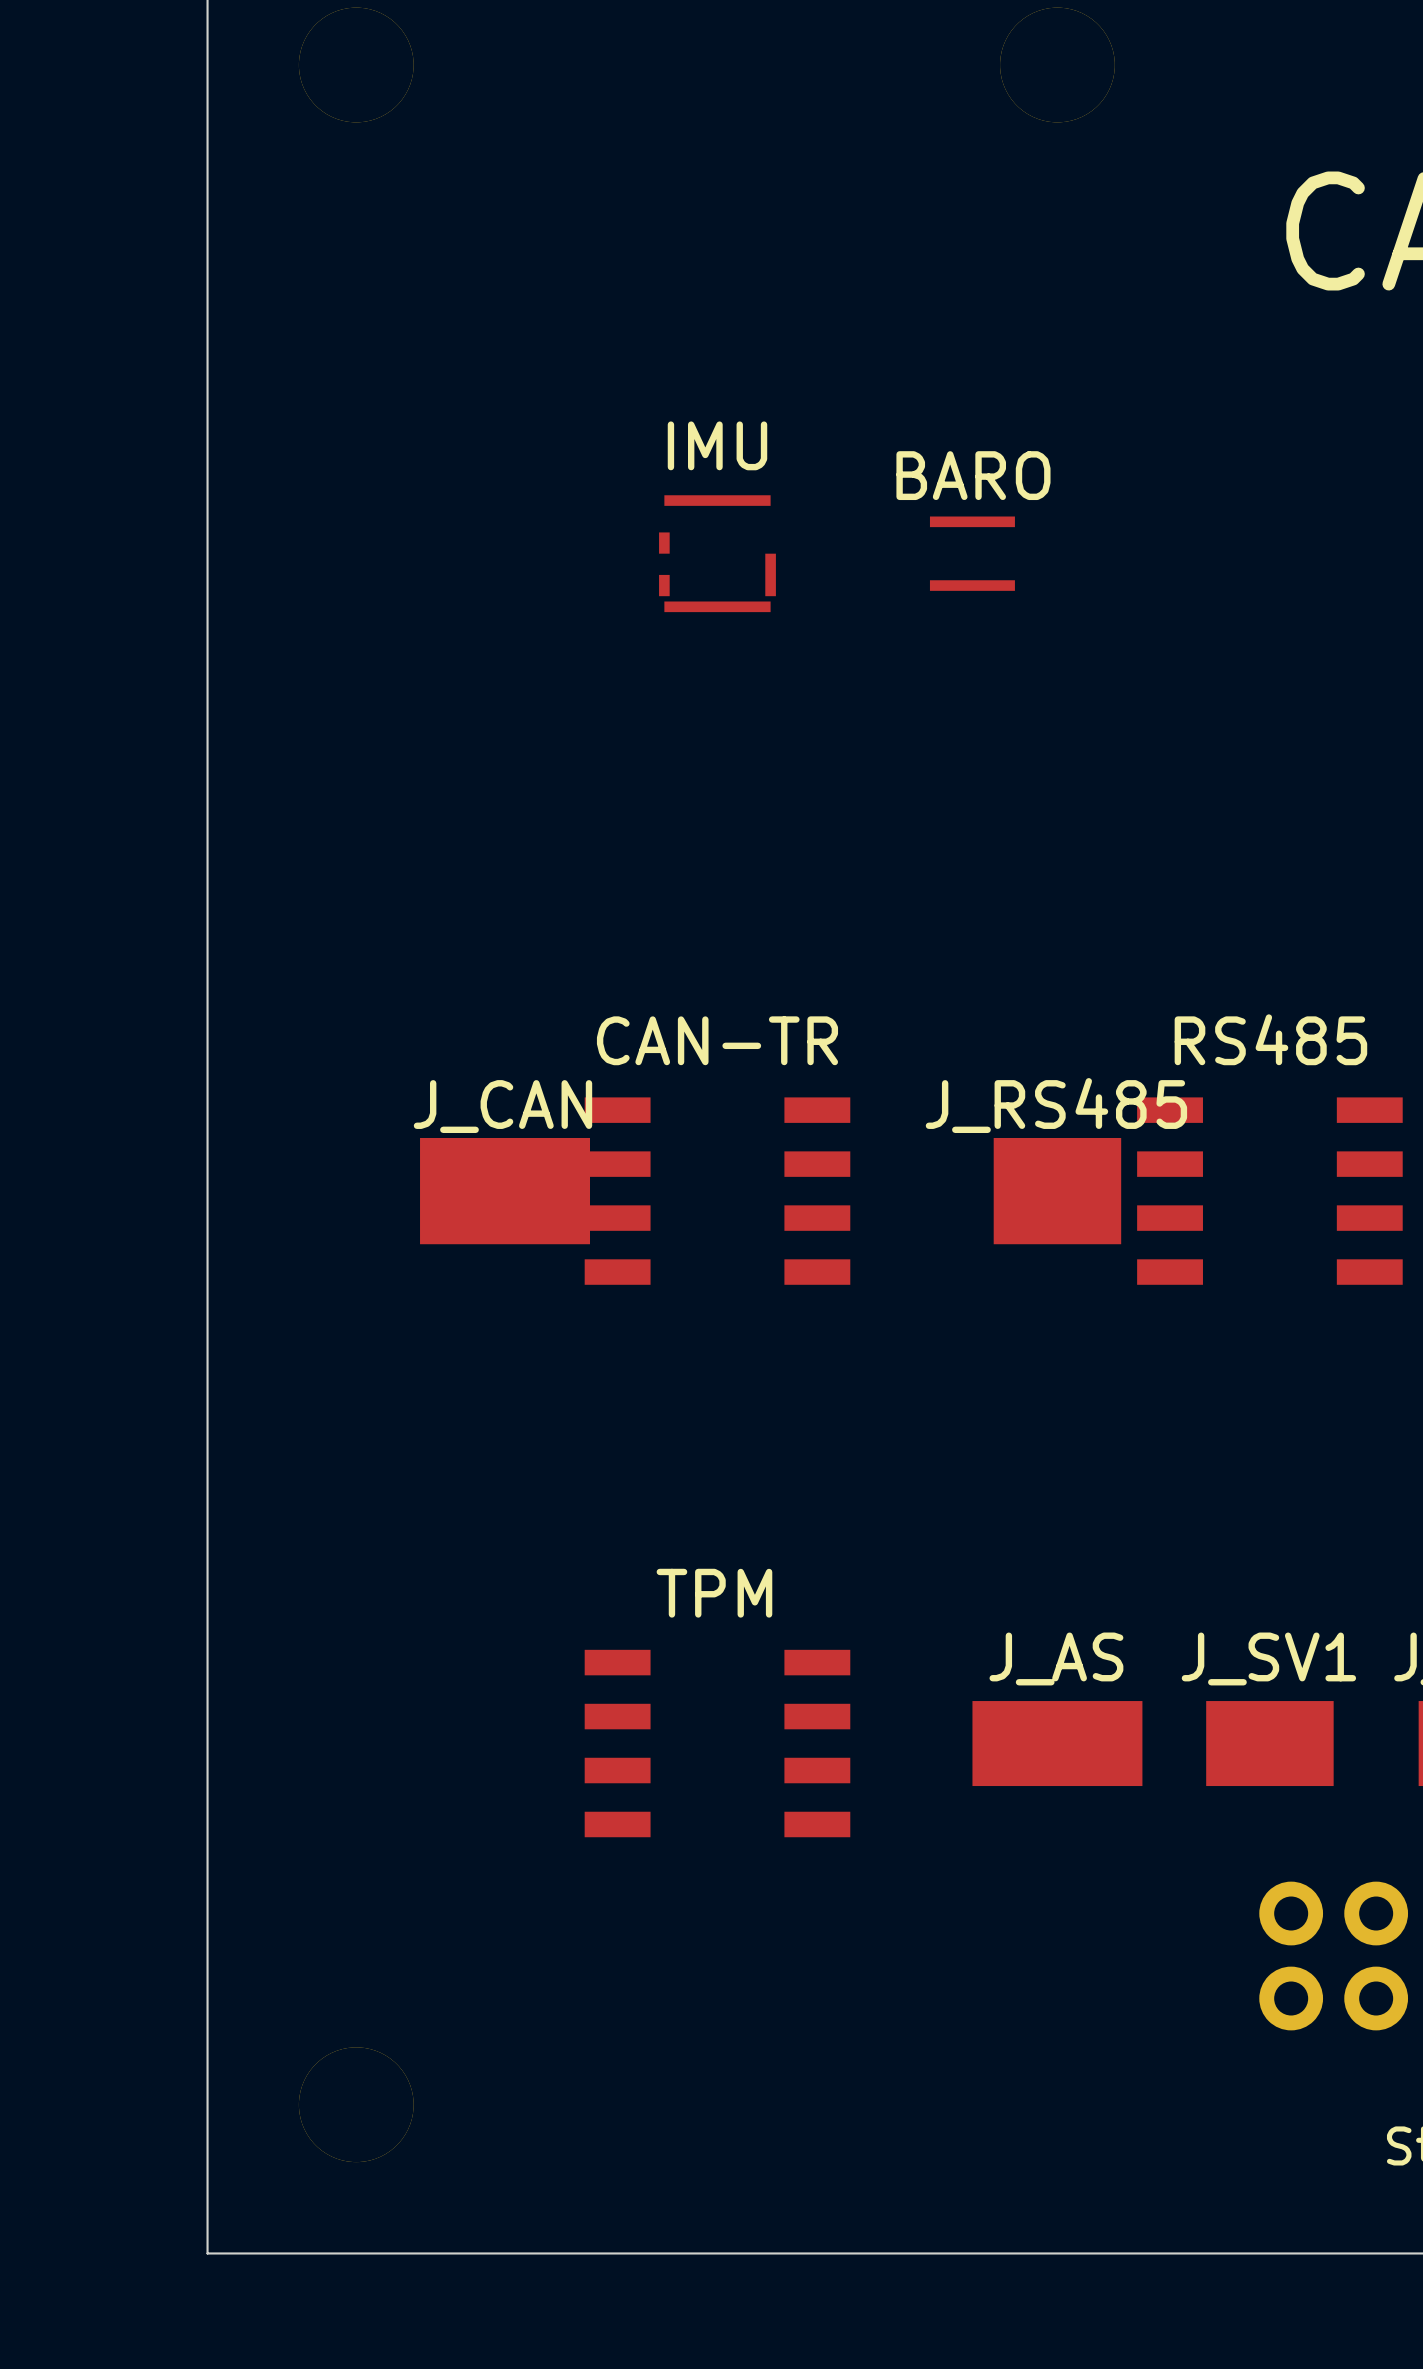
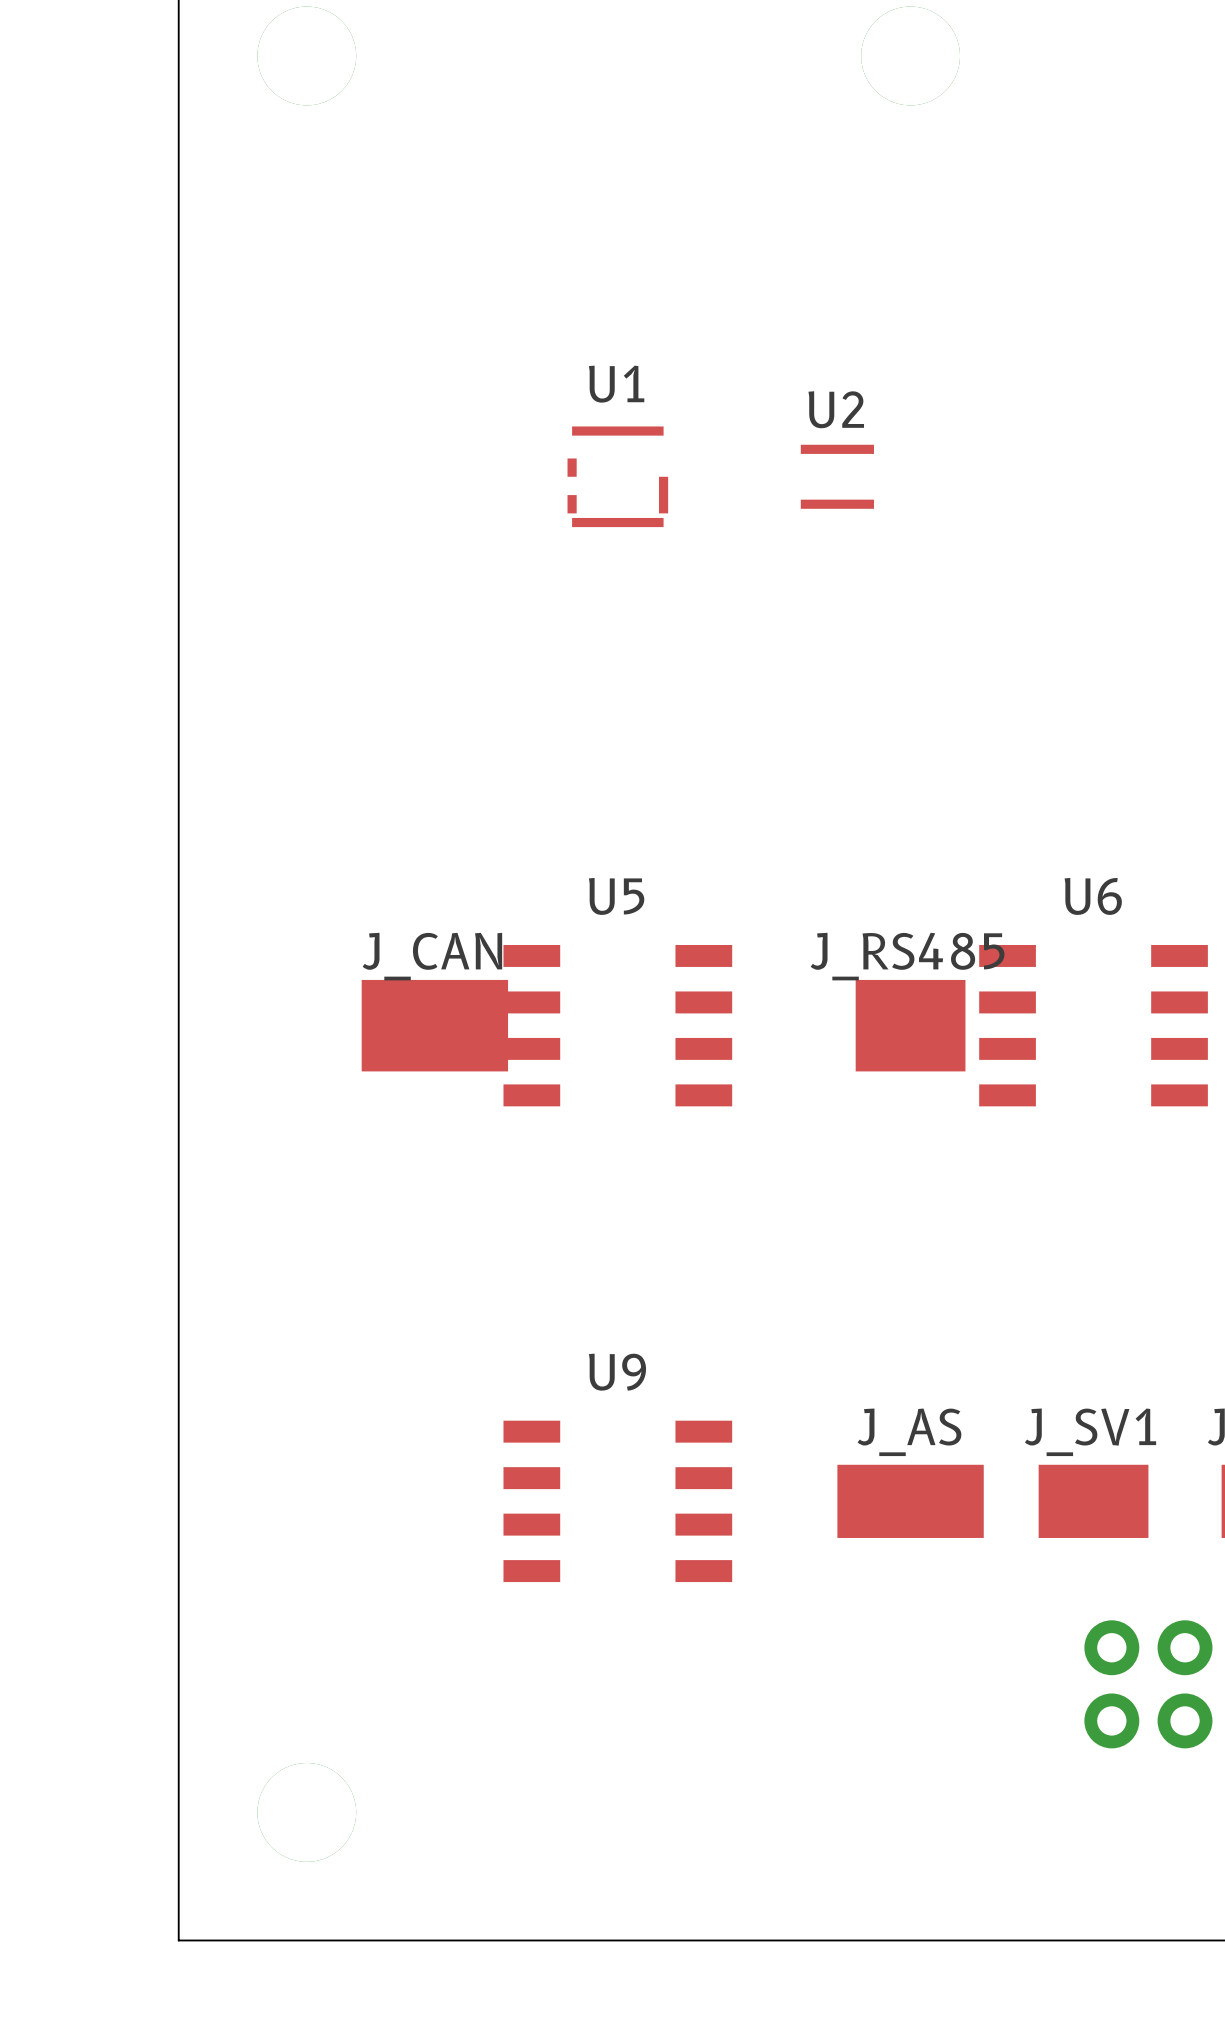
IMU name: IMU (717, 445) -> U1 (616, 384)
BARO name: BARO (973, 475) -> U2 (836, 409)
RS485 name: RS485 (1270, 1039) -> U6 (1093, 896)
CAN-TR name: CAN-TR (717, 1040) -> U5 (616, 896)
TPM name: TPM (714, 1593) -> U9 (617, 1372)

